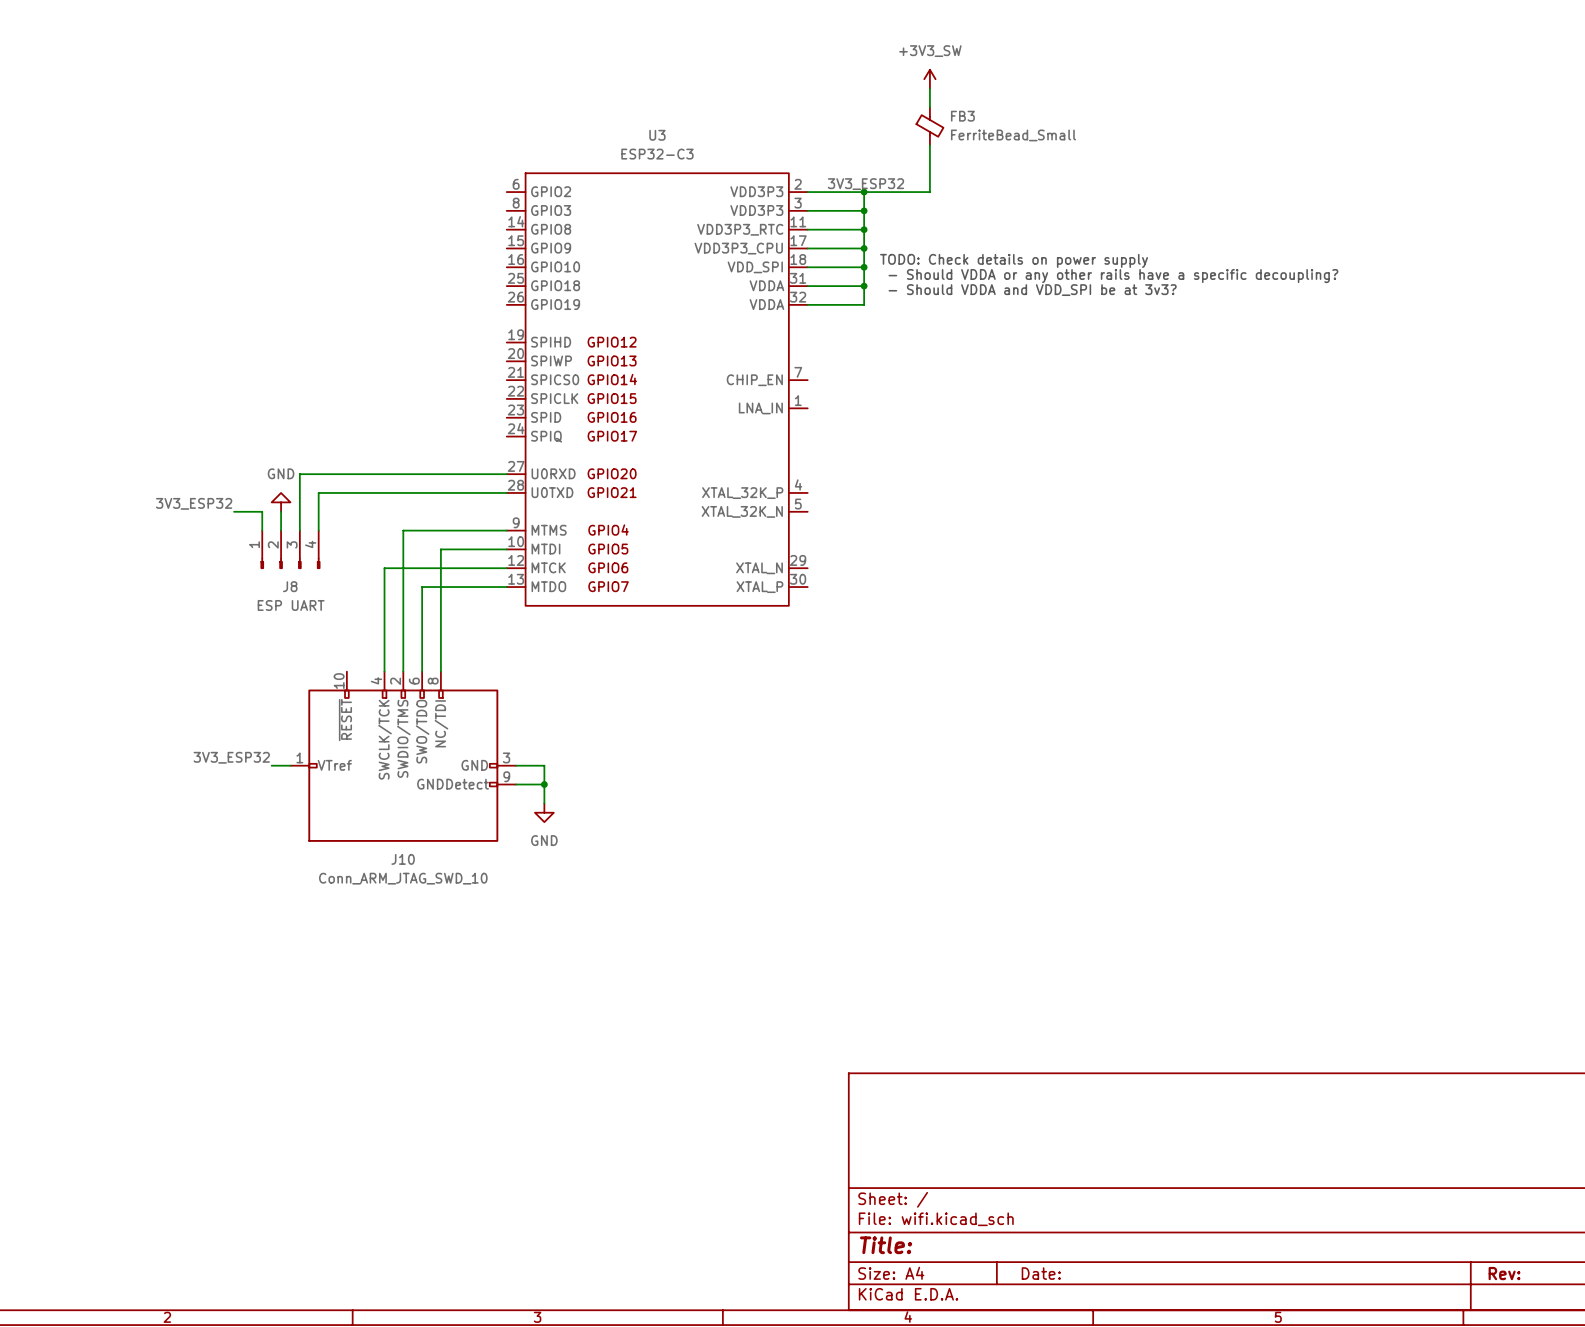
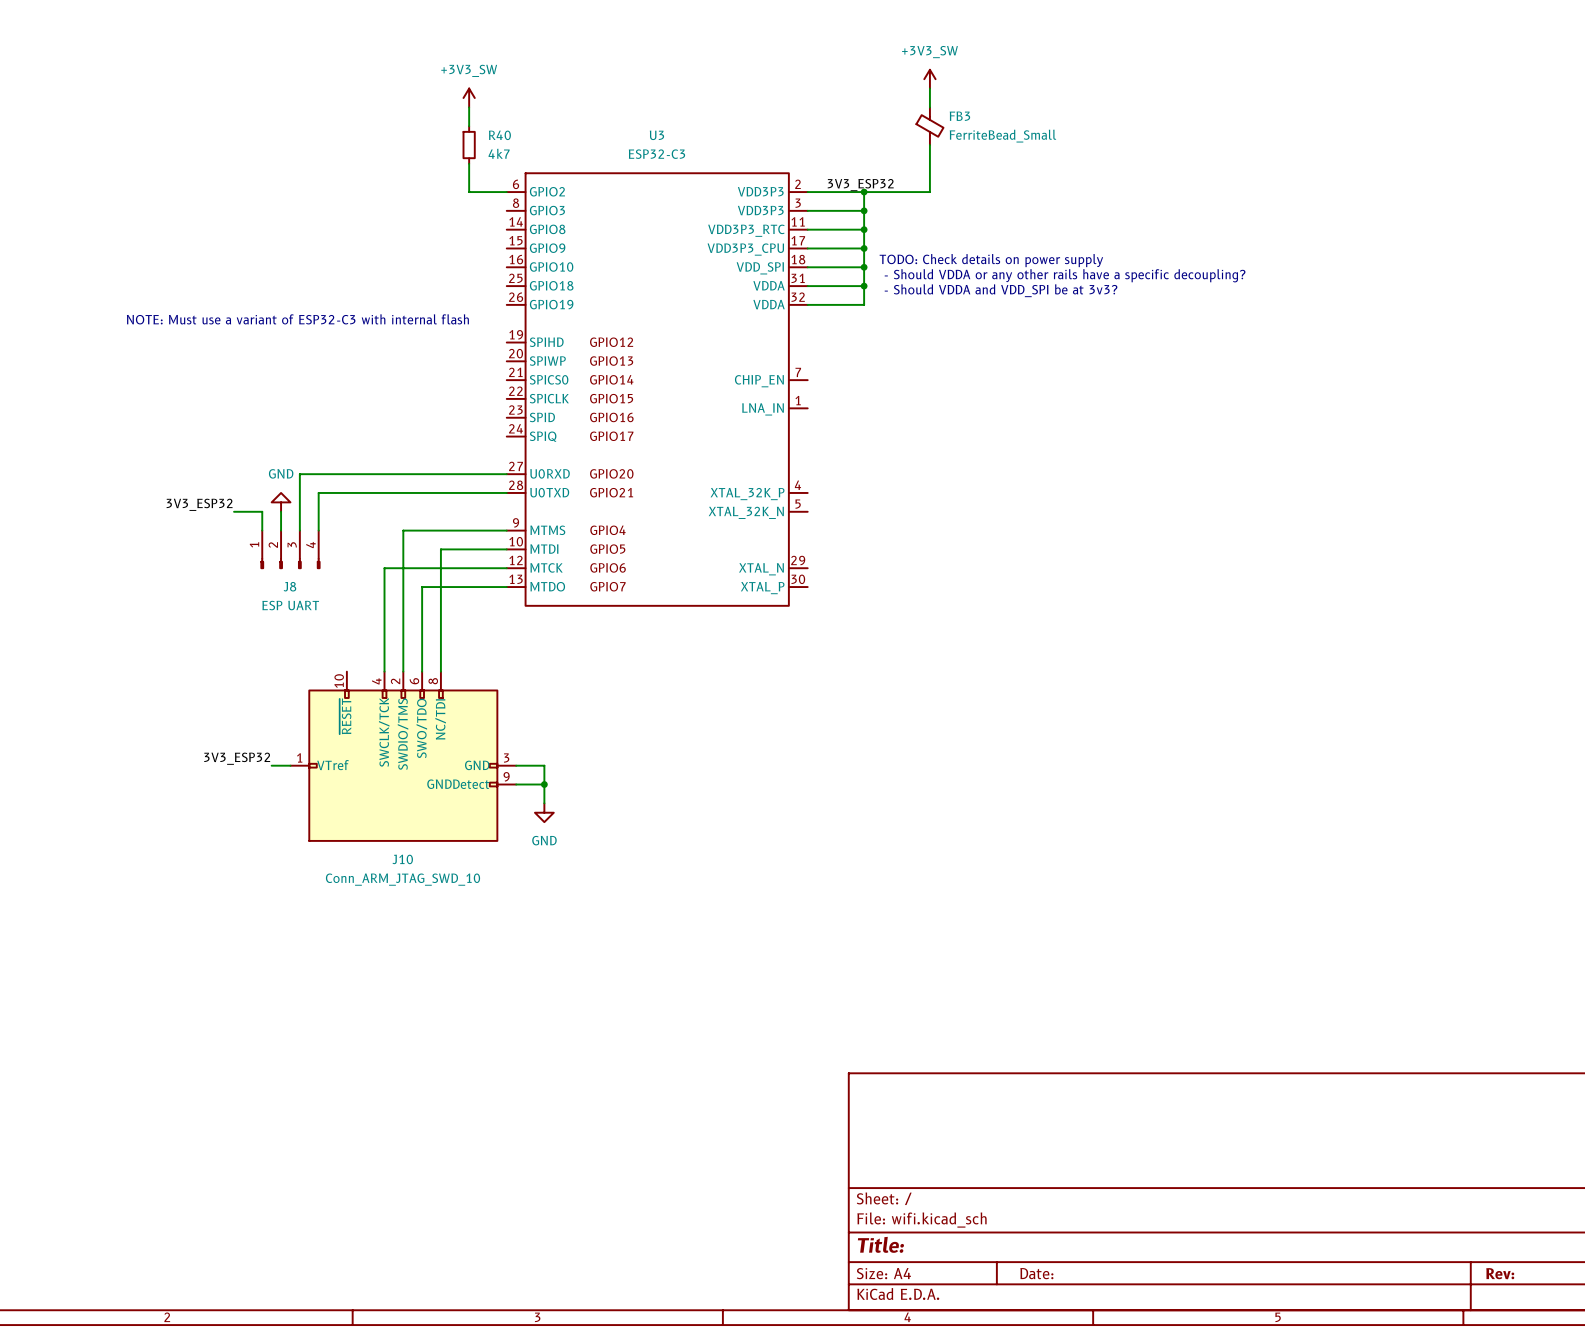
power symbol: none -> +3V3_SW (469, 98)
wire: none -> (469, 107) (469, 126)
R40: none -> 4k7 (469, 145)
wire: none -> (469, 163) (469, 192) (506, 192)
text: none -> NOTE: Must use a variant of ESP32-C3 with internal flash (297, 319)

